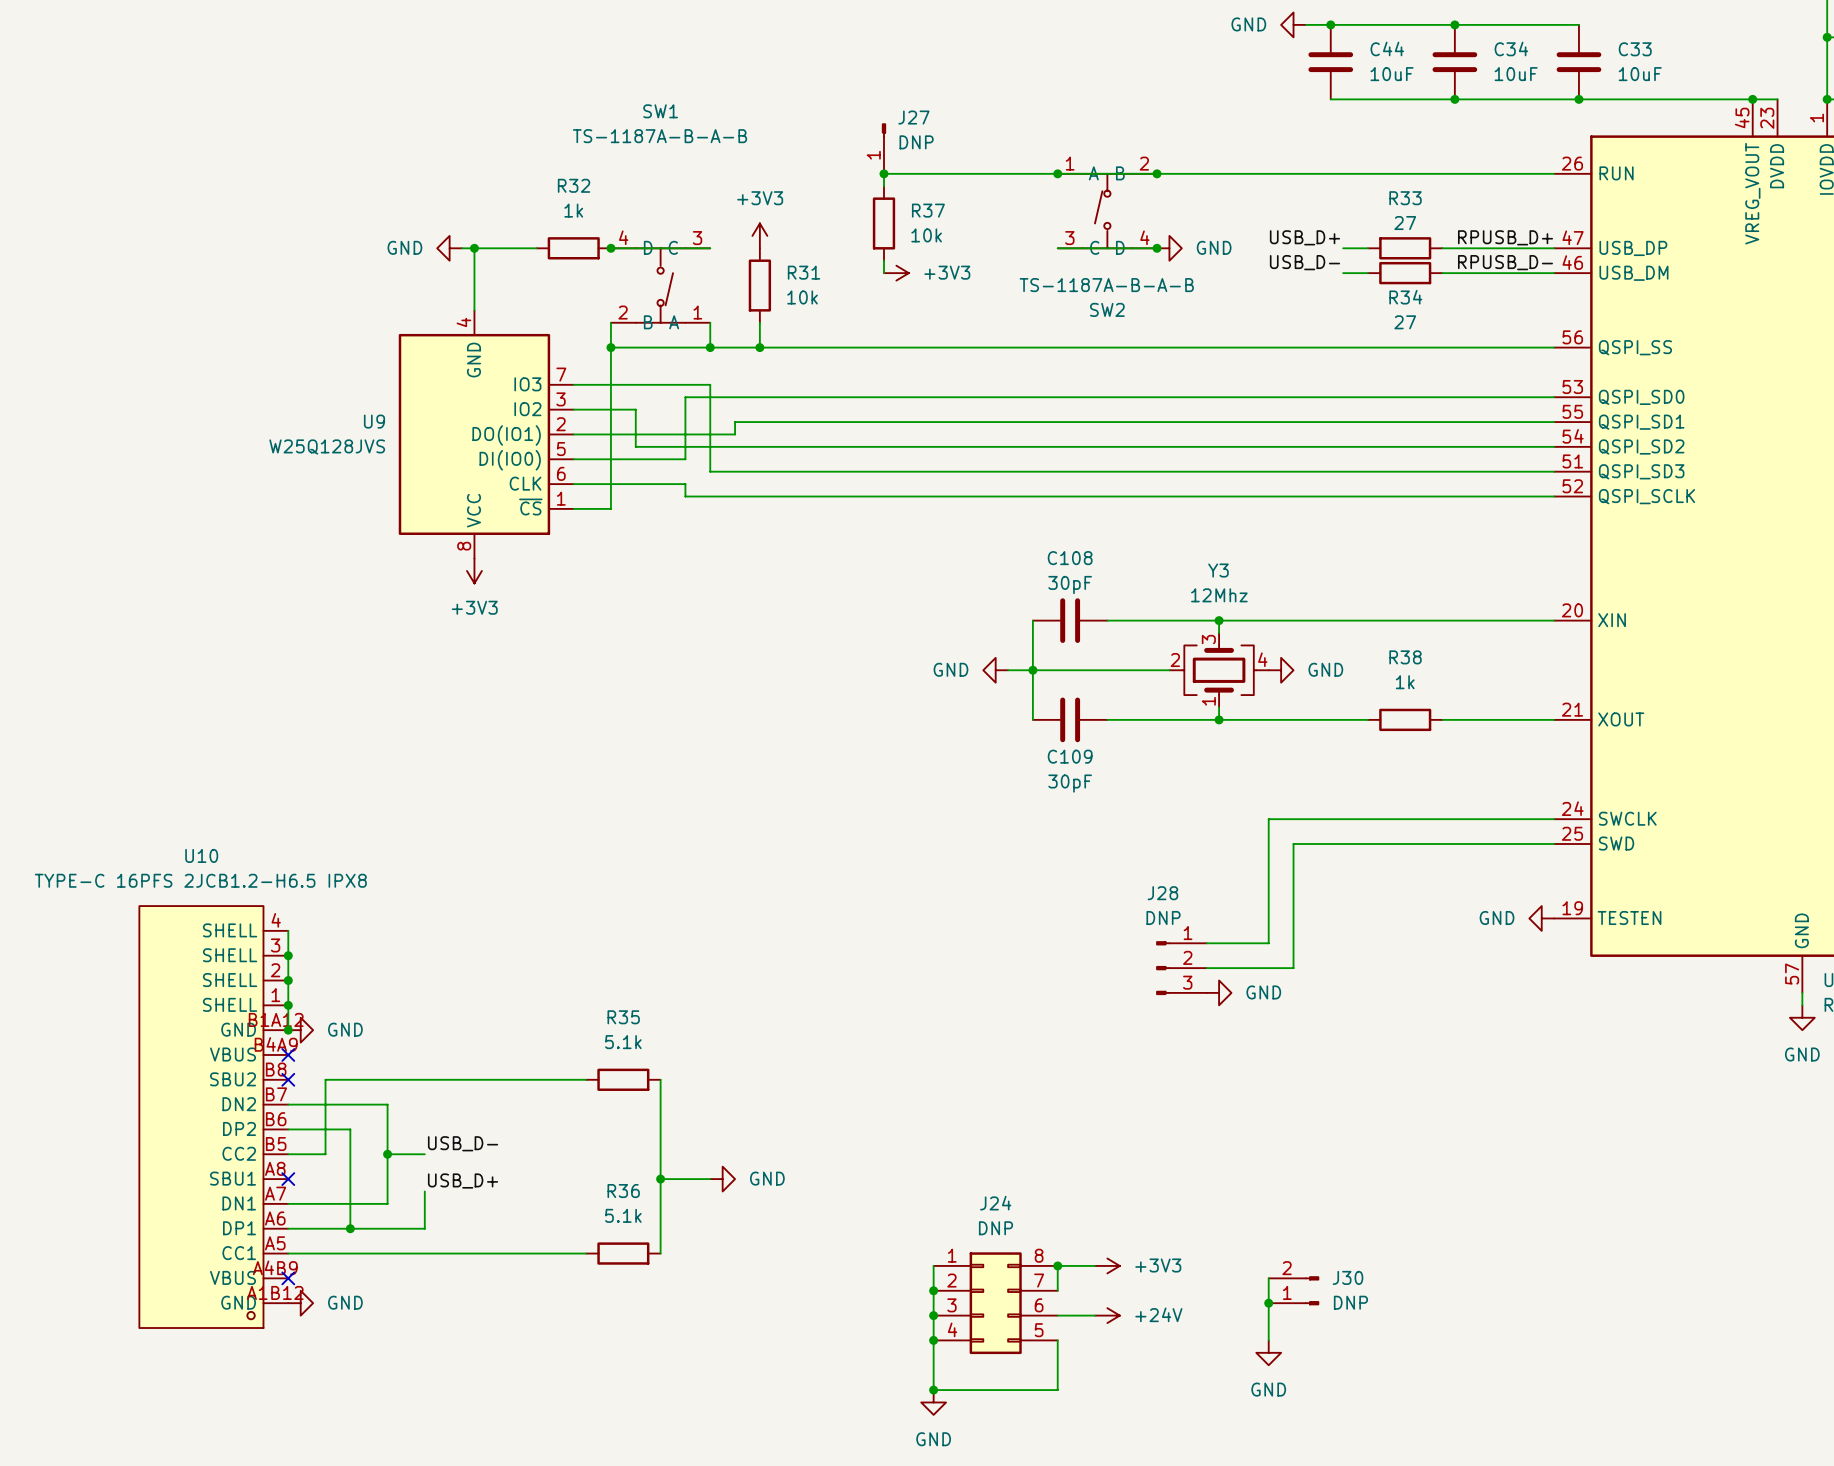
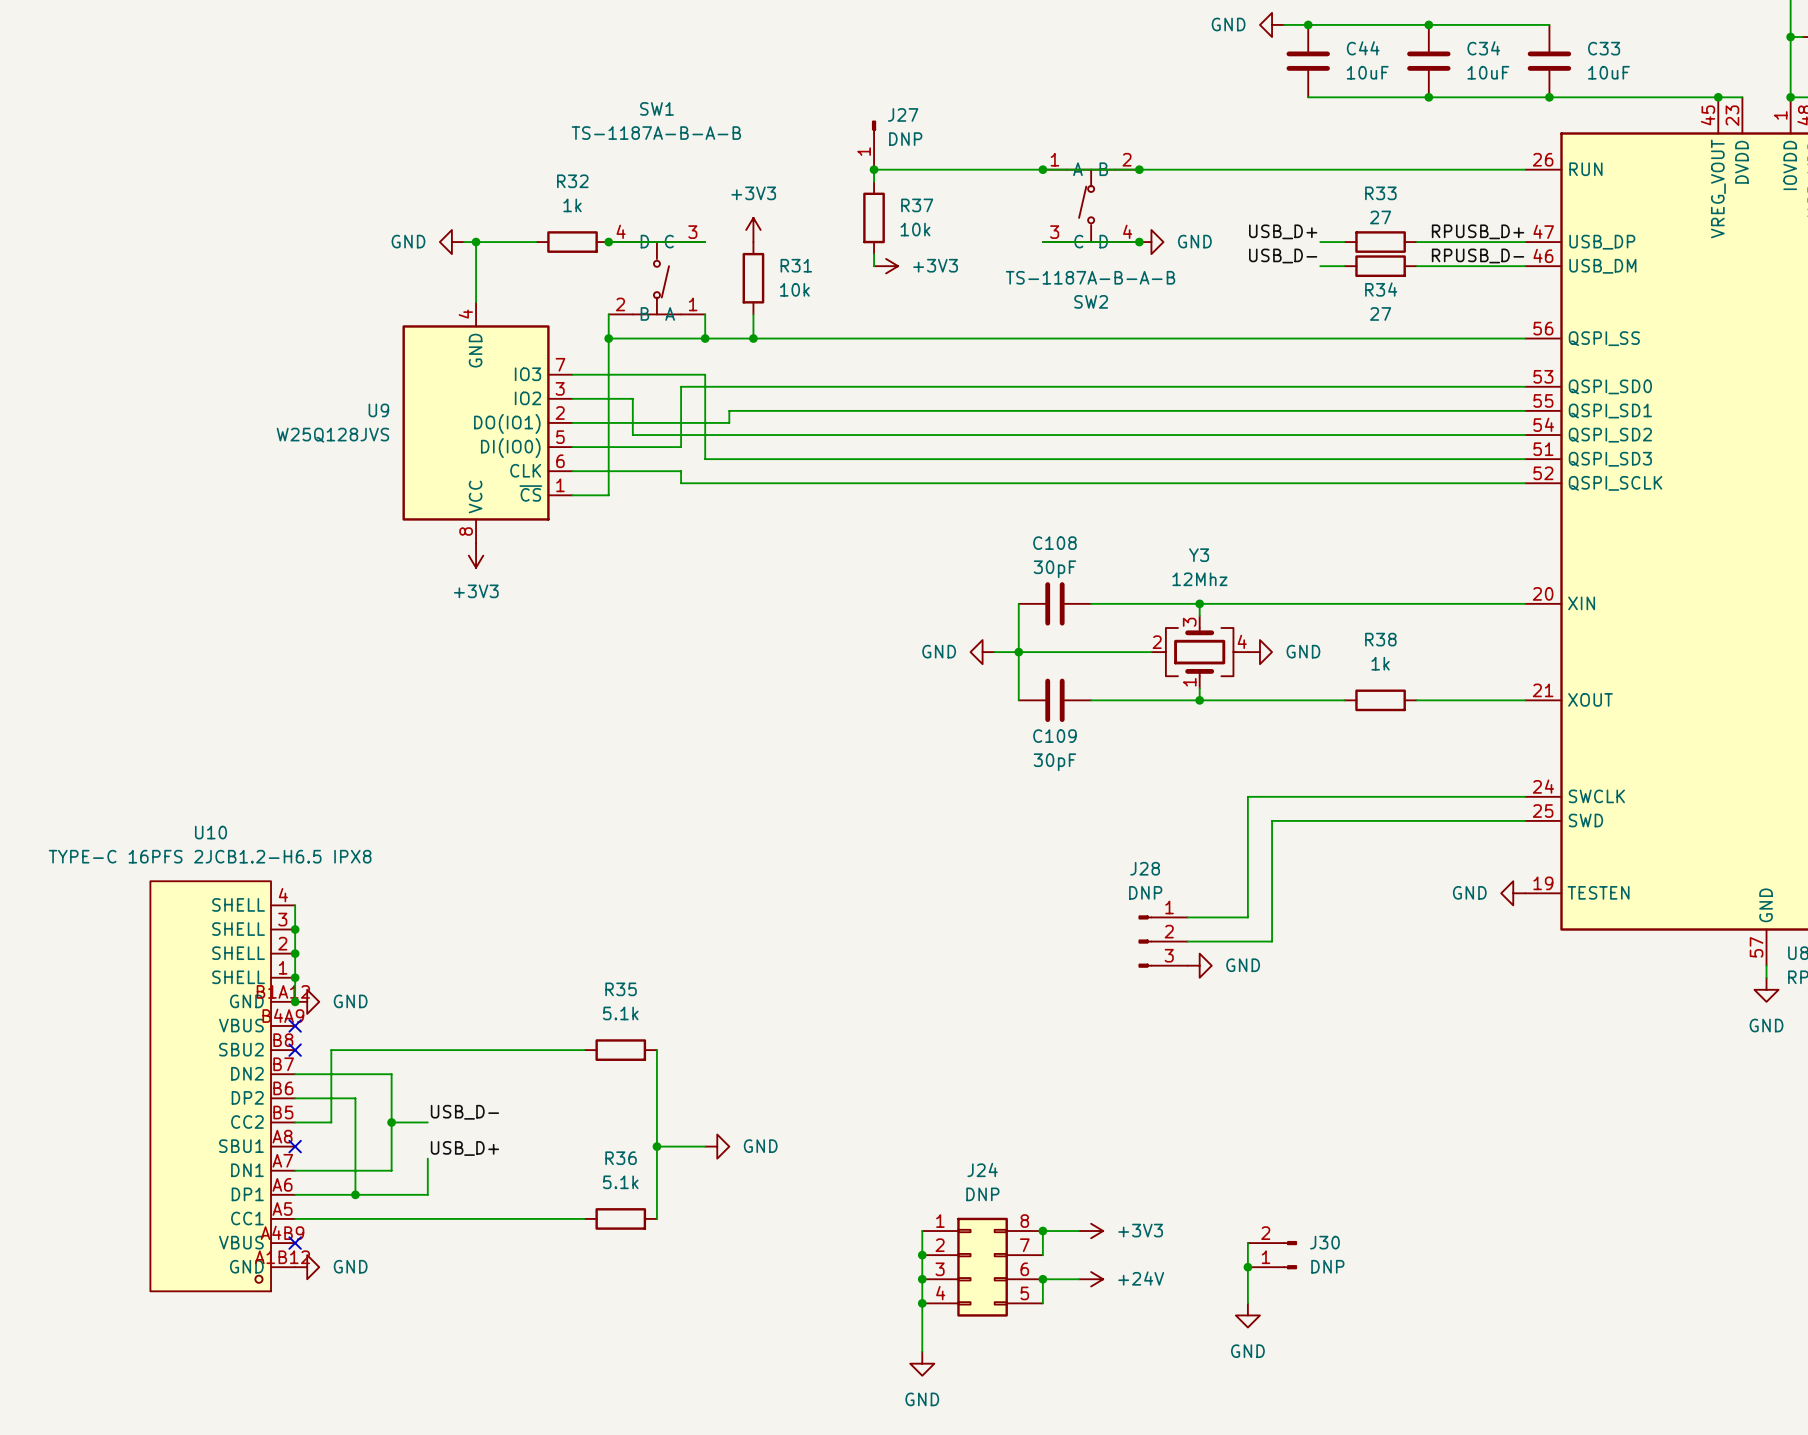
junction: none -> (1042, 1279)
wire: (1057, 1340) (1057, 1390) (933, 1390) -> (1042, 1303) (1042, 1279)
junction: (933, 1390) -> none

